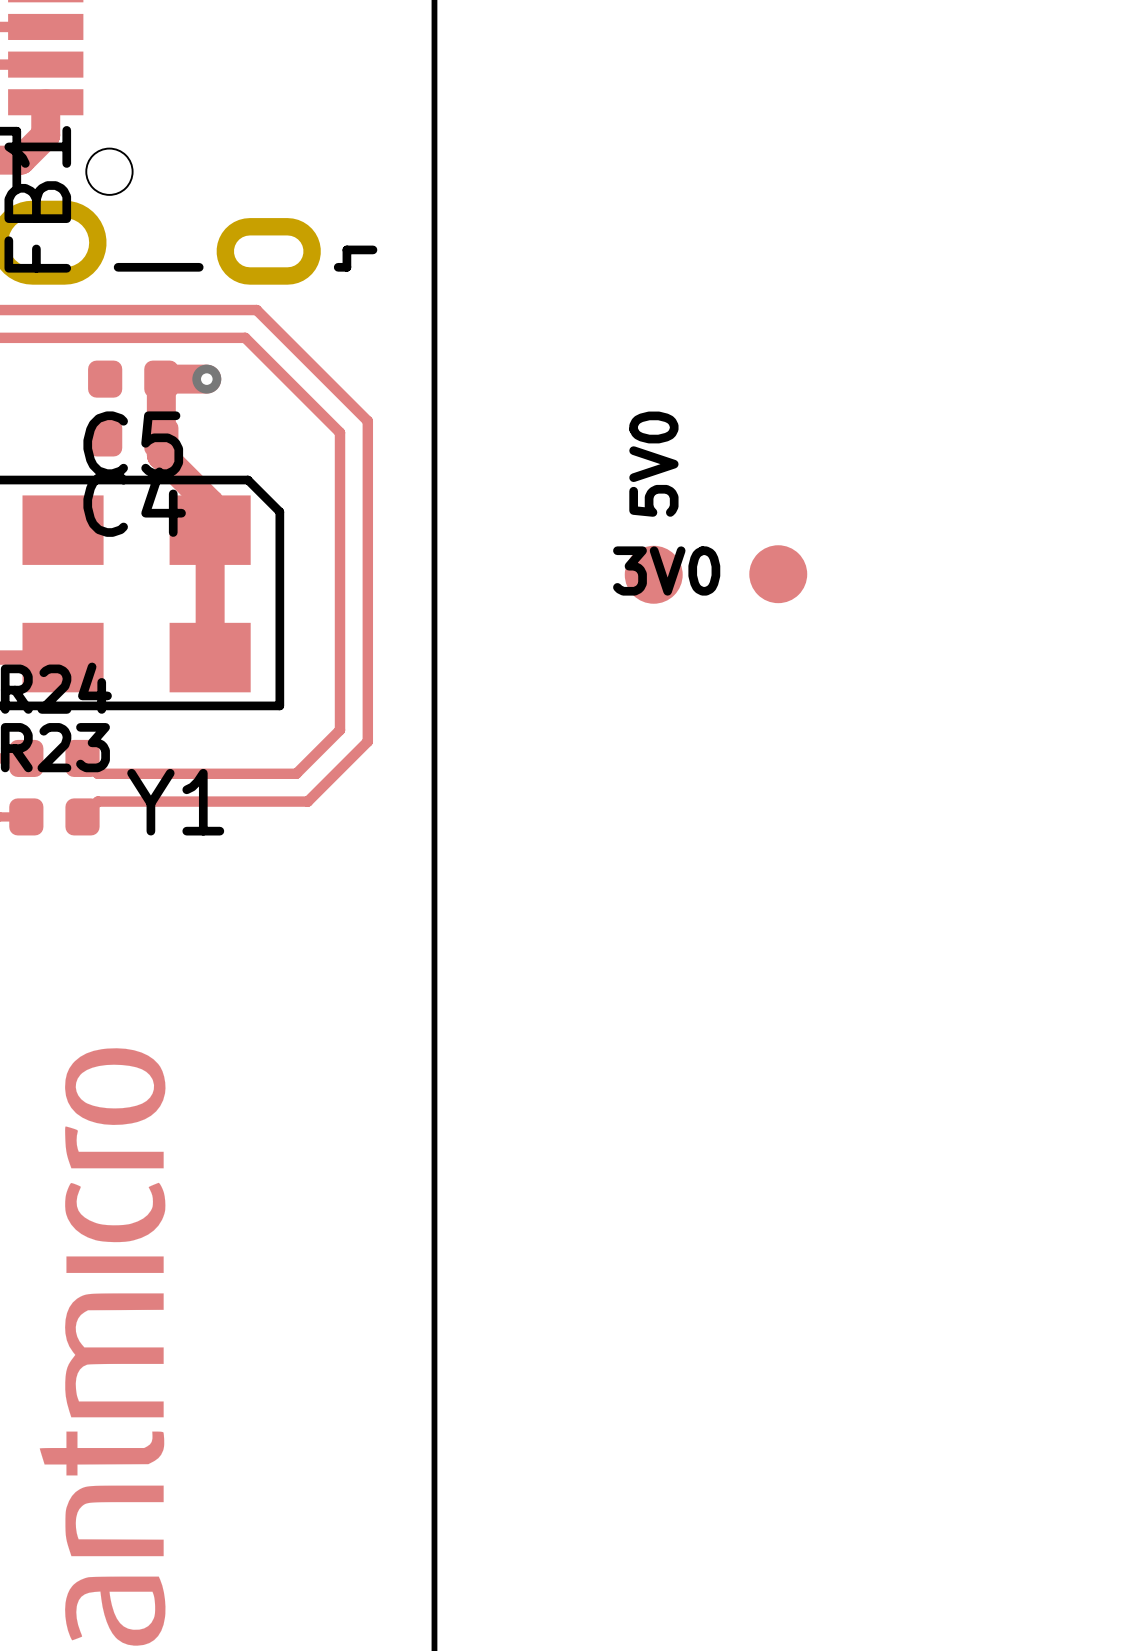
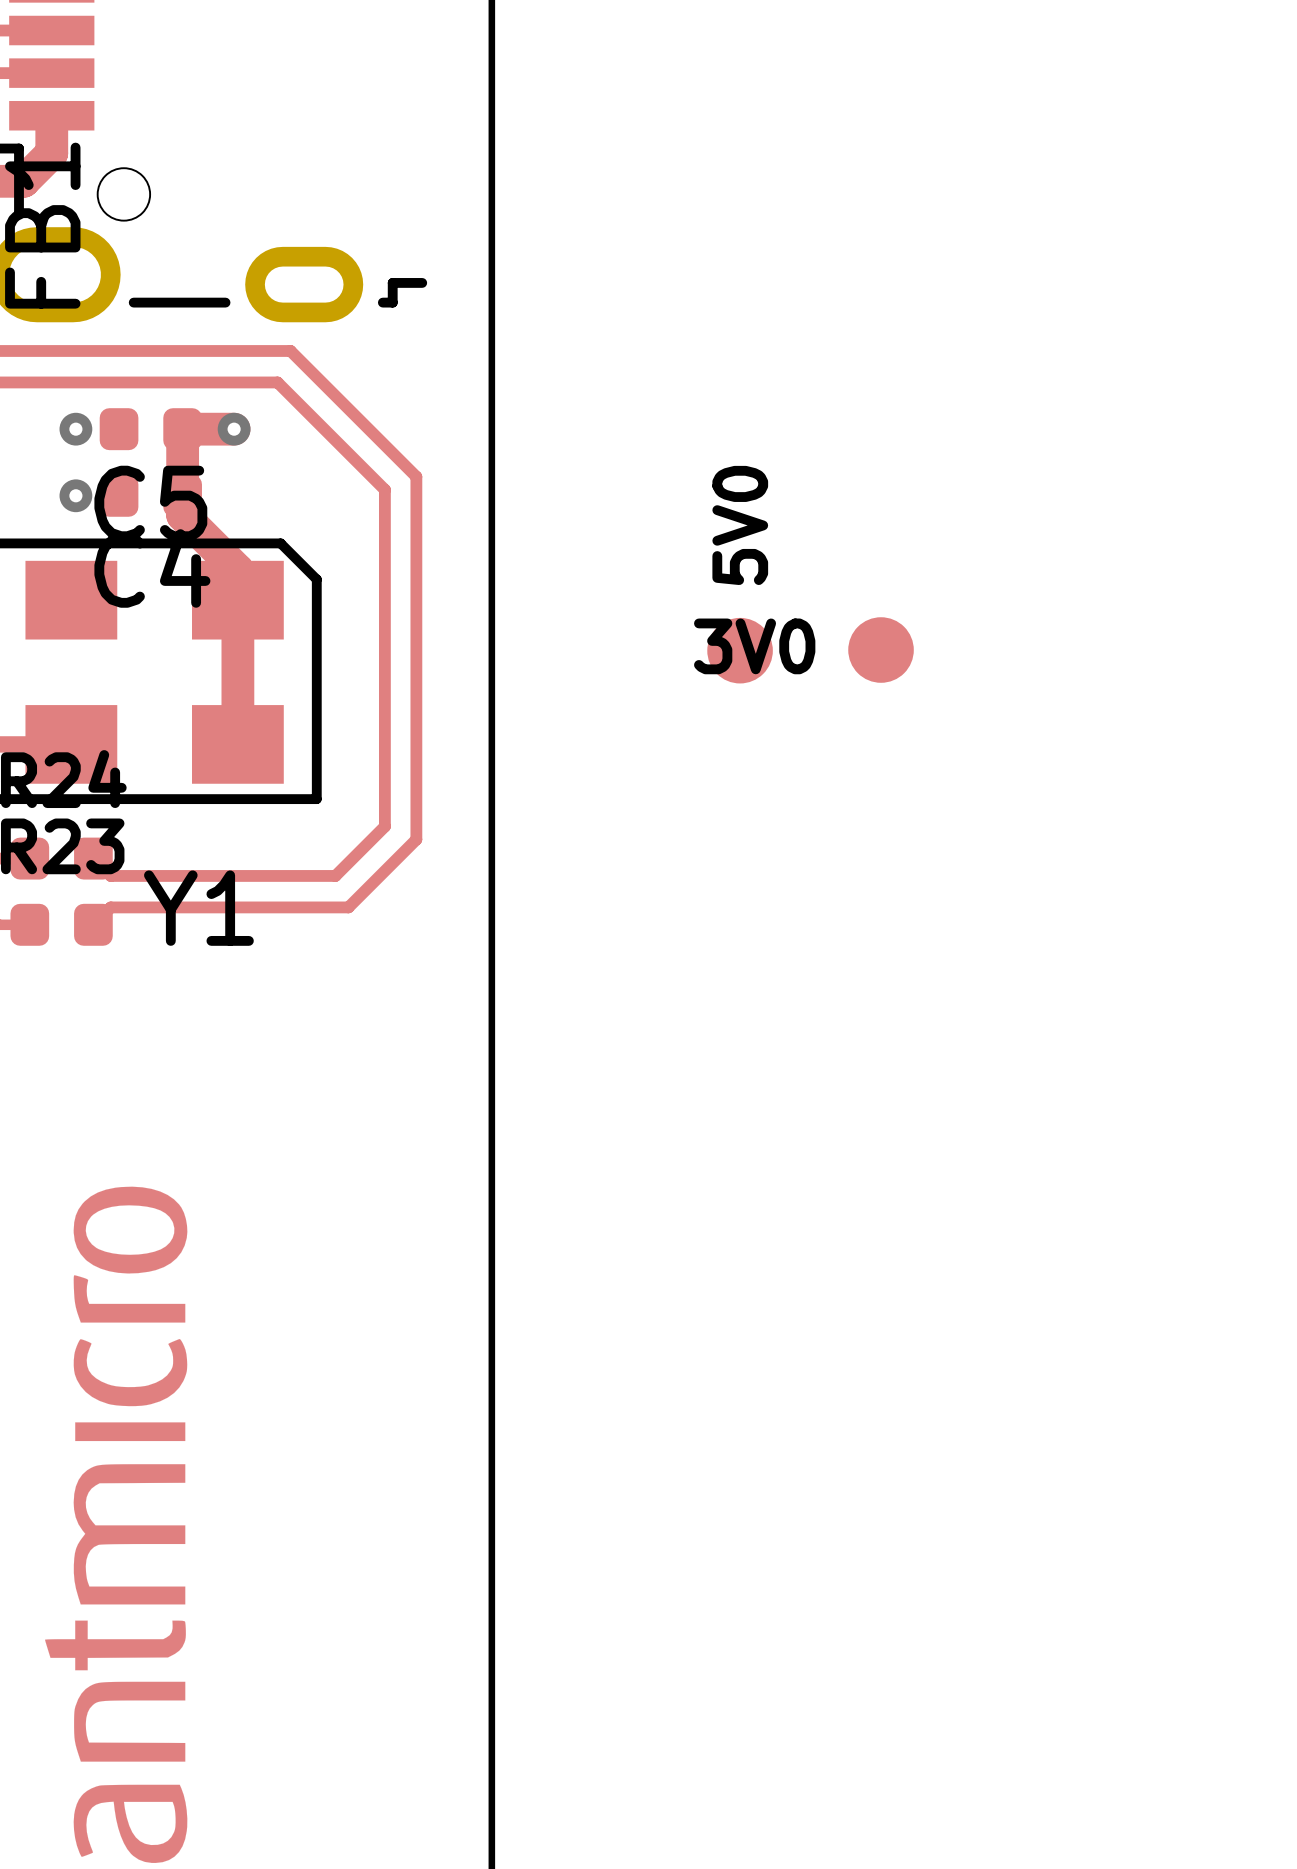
via: none -> (75, 429)
via: none -> (75, 495)

